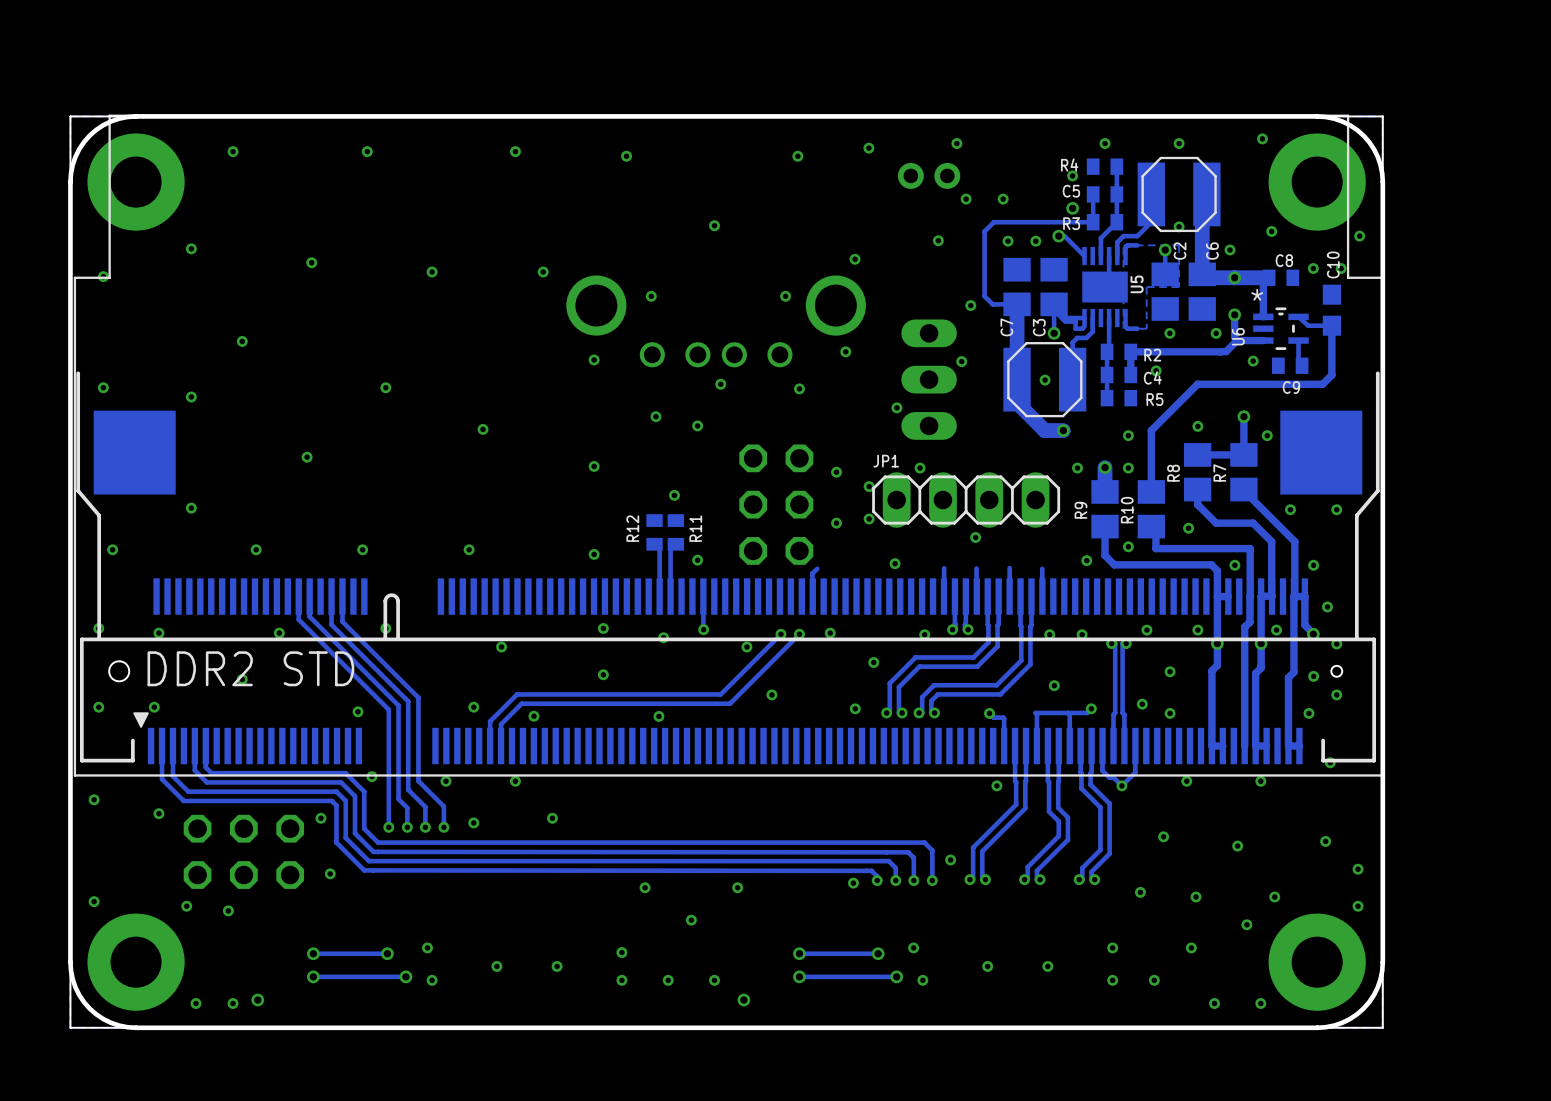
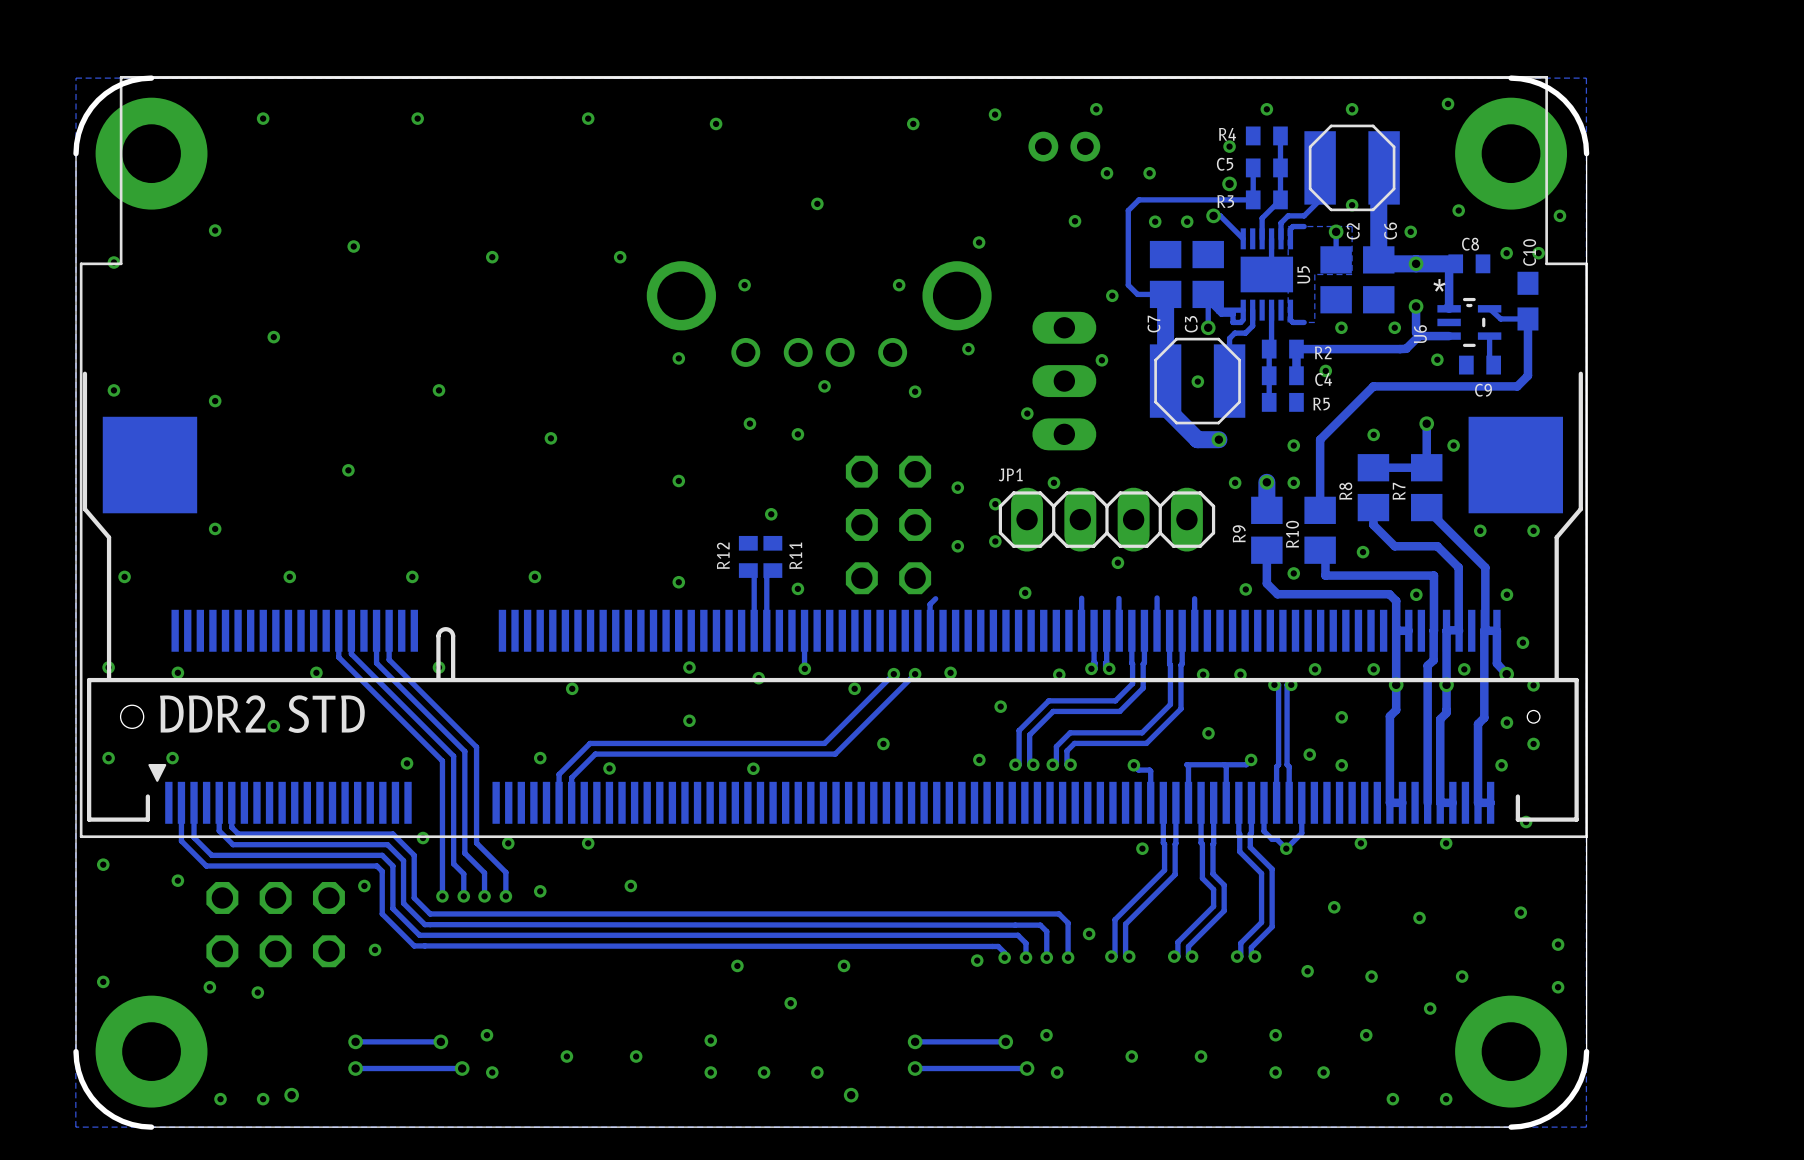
board edge: (1382, 116) (70, 116) (70, 1027) (1382, 1027) (1382, 116) -> none

